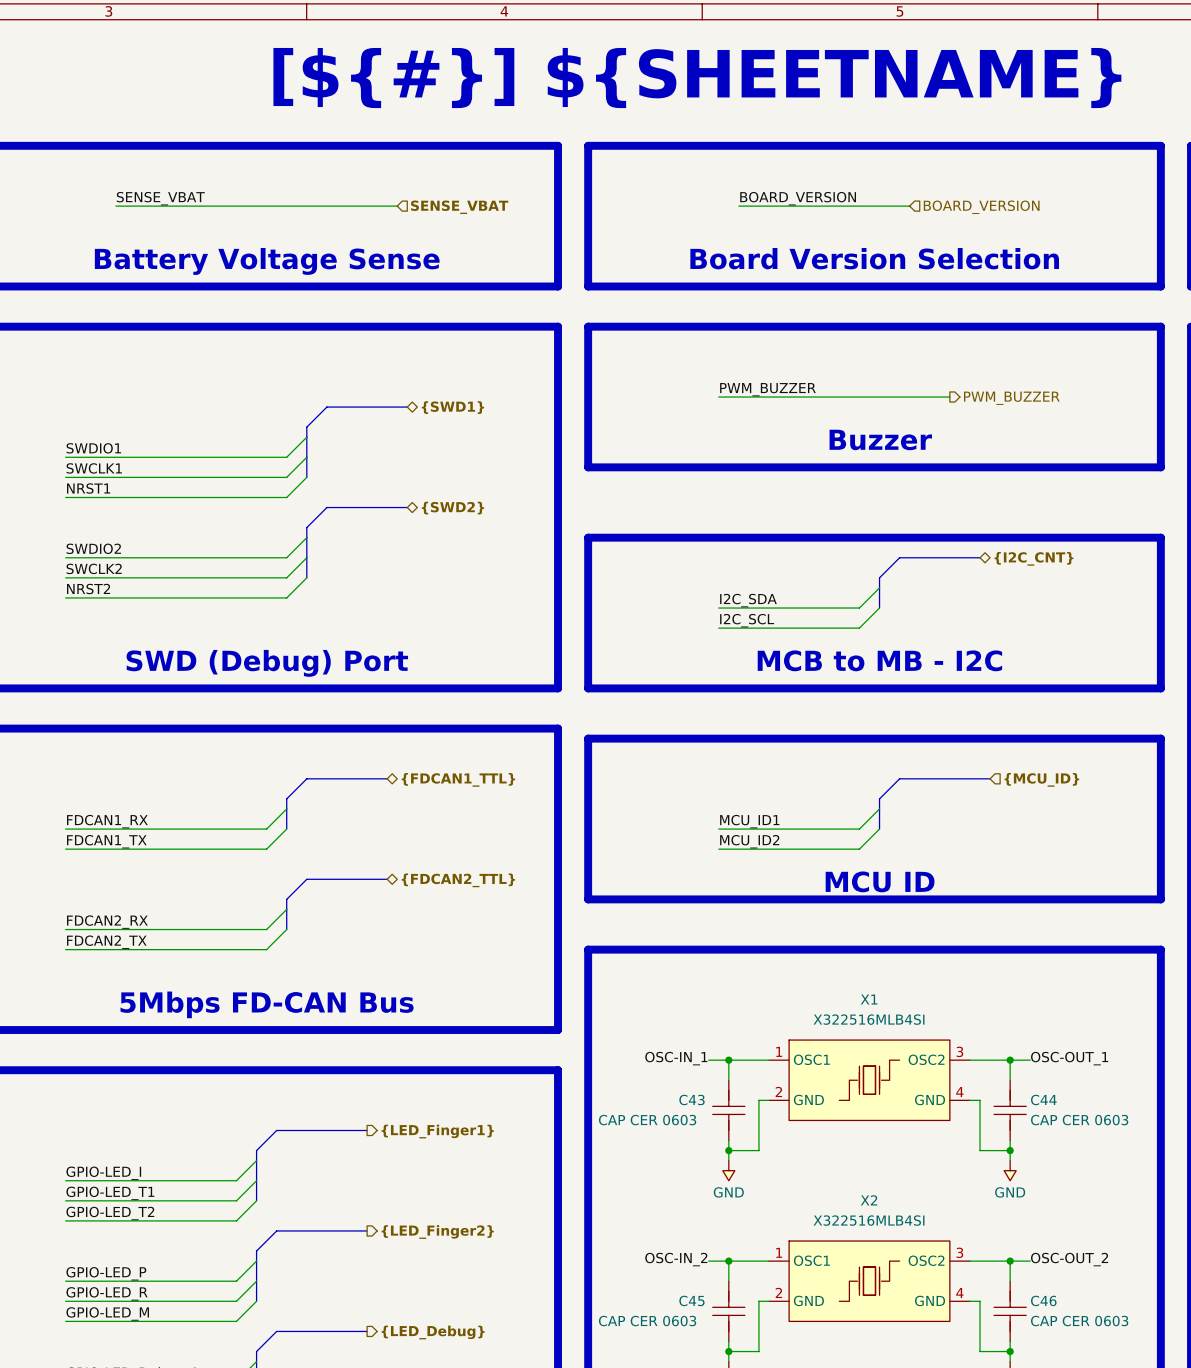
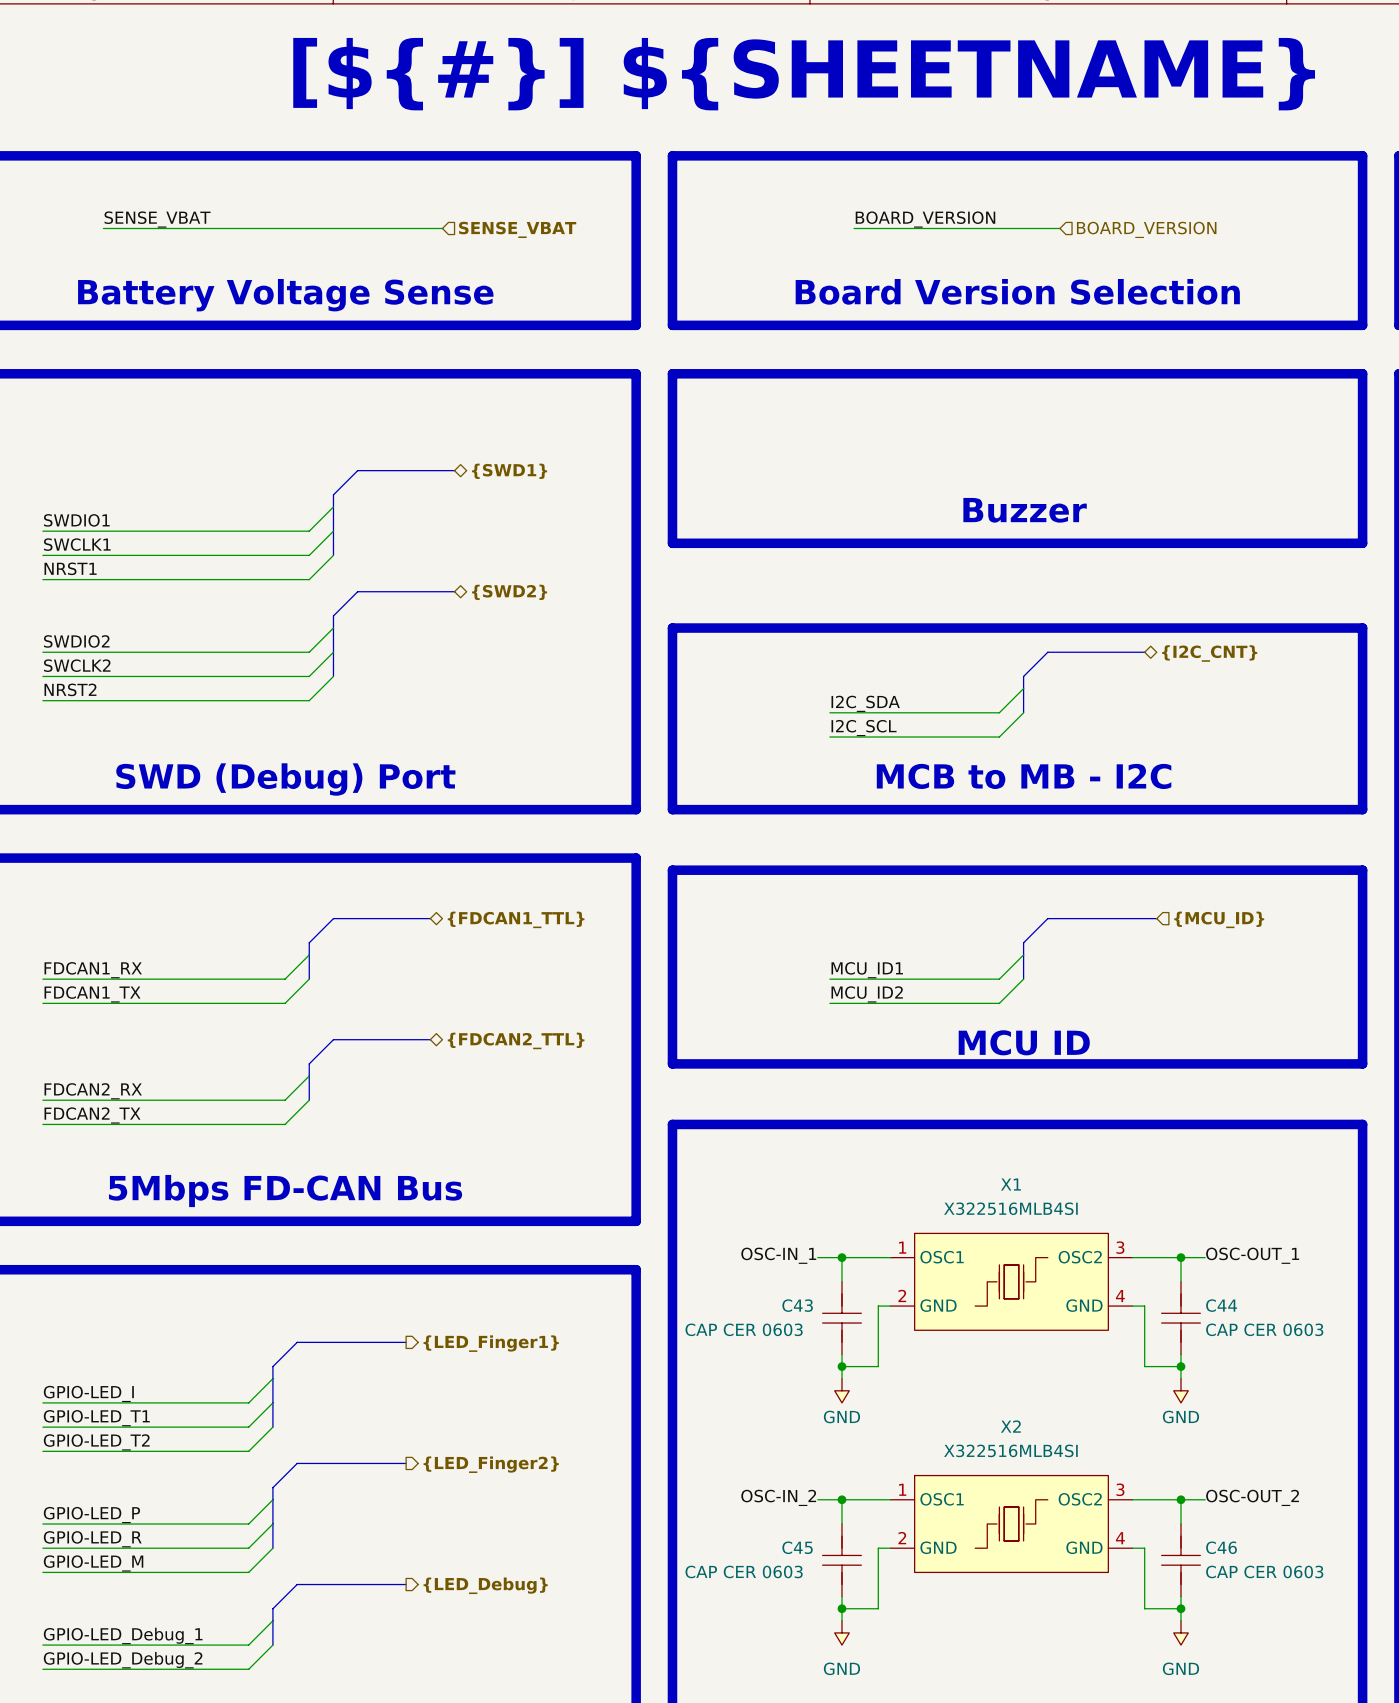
label: PWM_BUZZER (767, 389) -> none
wire: (718, 397) (949, 397) -> none
hierarchical label: PWM_BUZZER (1011, 398) -> none

